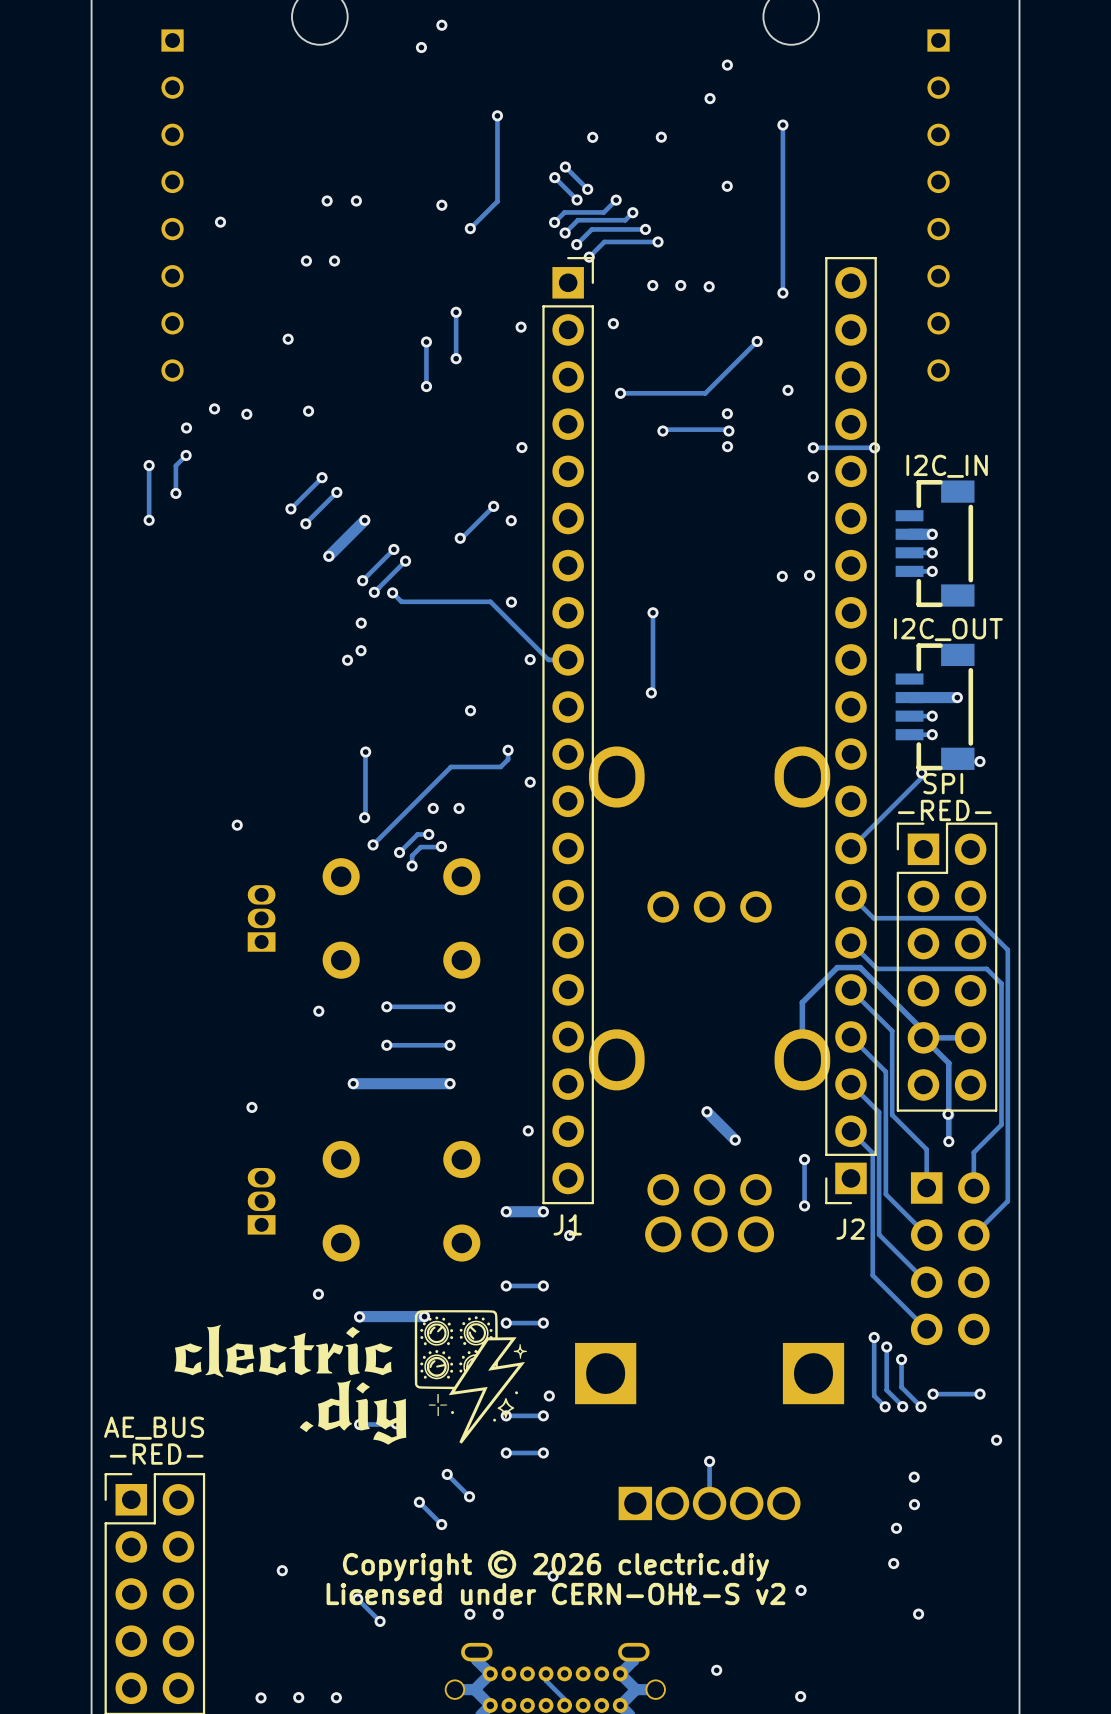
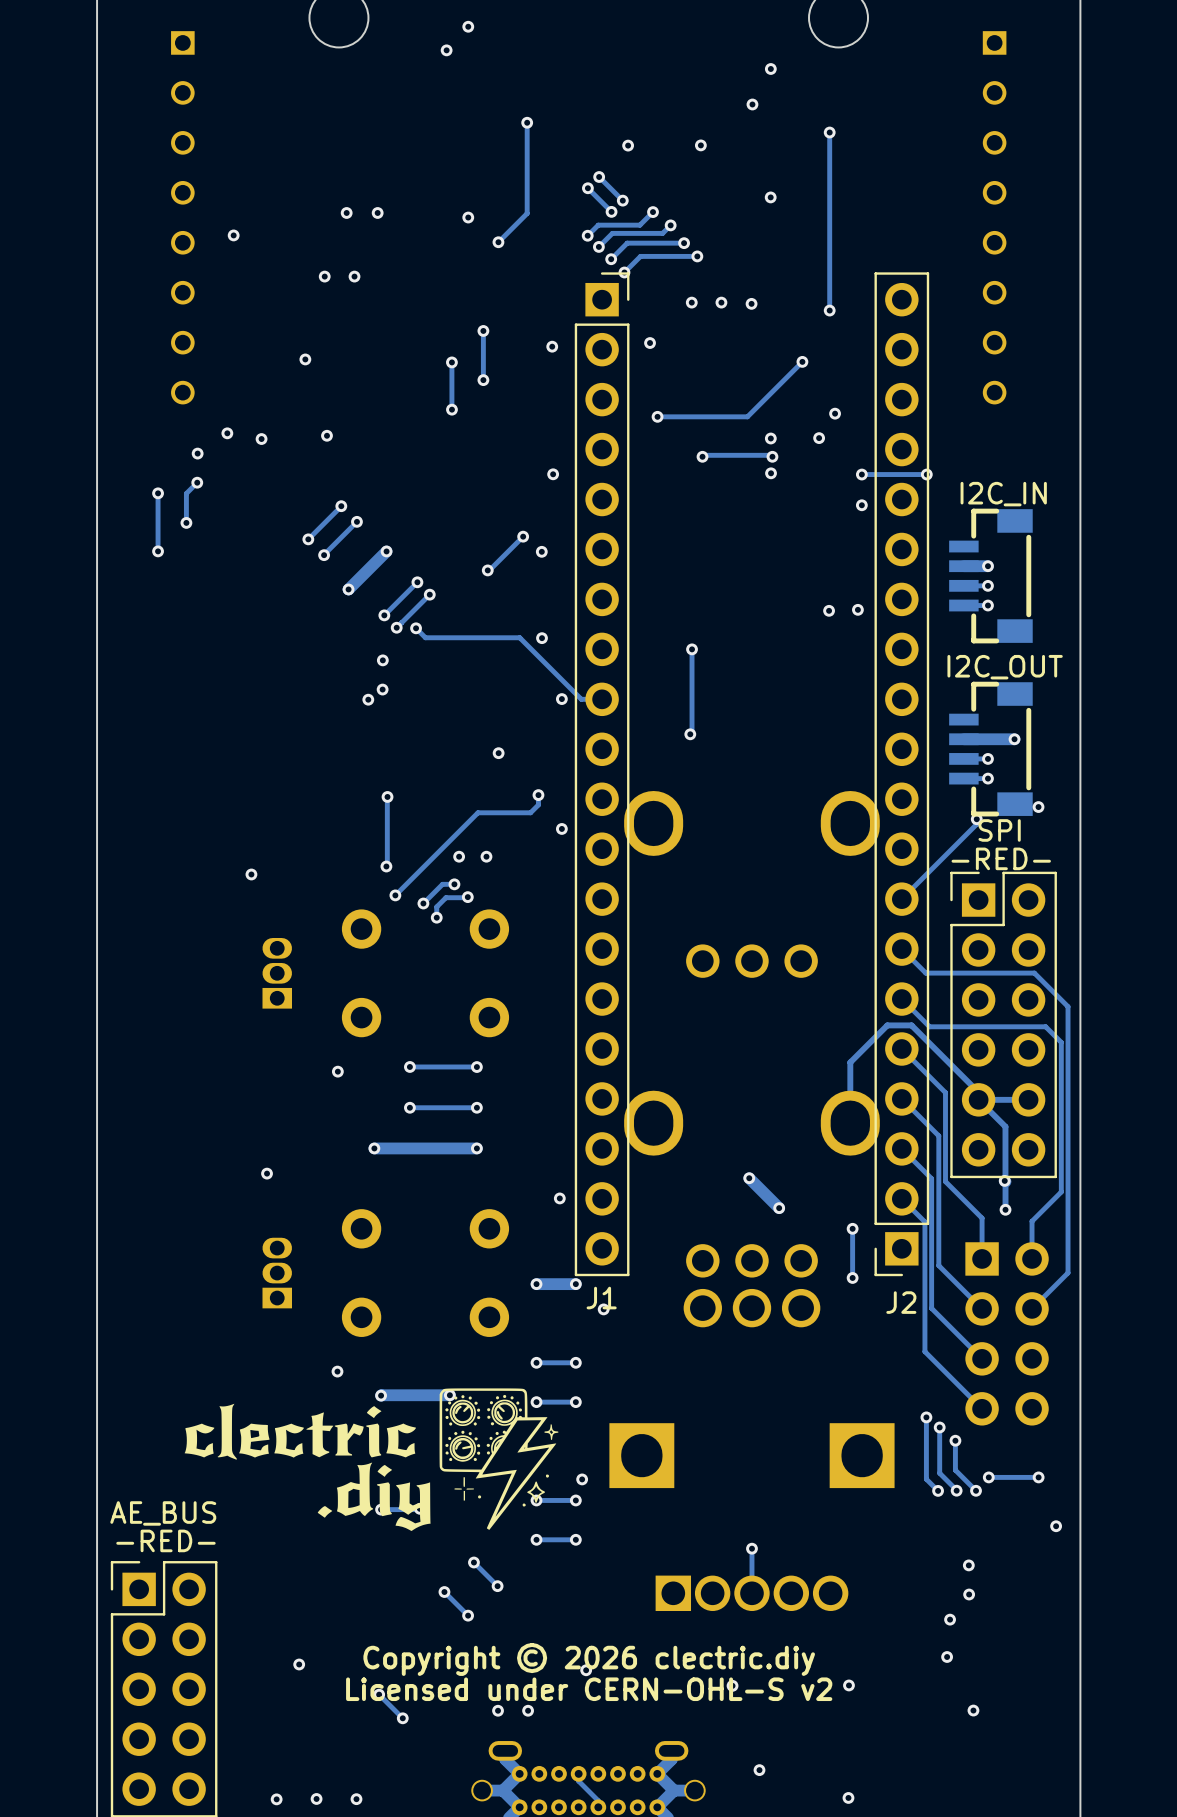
via: none -> (819, 438)

